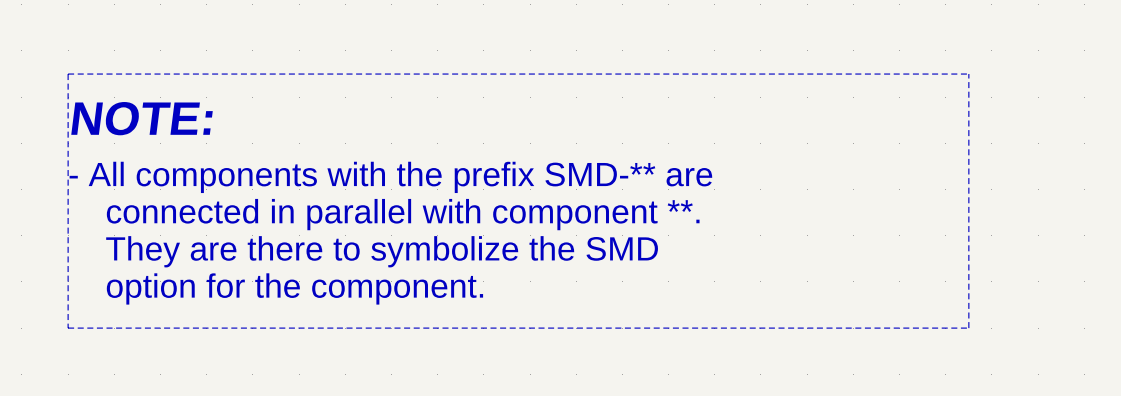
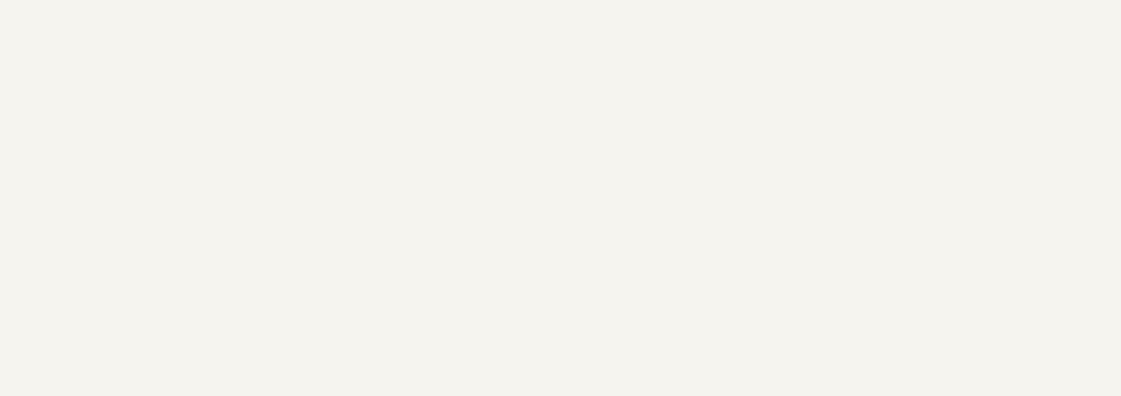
line: (68, 74) (68, 328) (968, 328) (968, 74) (68, 74) -> none
text: NOTE: (142, 118) -> none
text: - All components with the prefix SMD-** are (390, 177) -> none
text: connected in parallel with component **. (403, 214) -> none
text: They are there to symbolize the SMD (382, 251) -> none
text: option for the component. (294, 288) -> none

